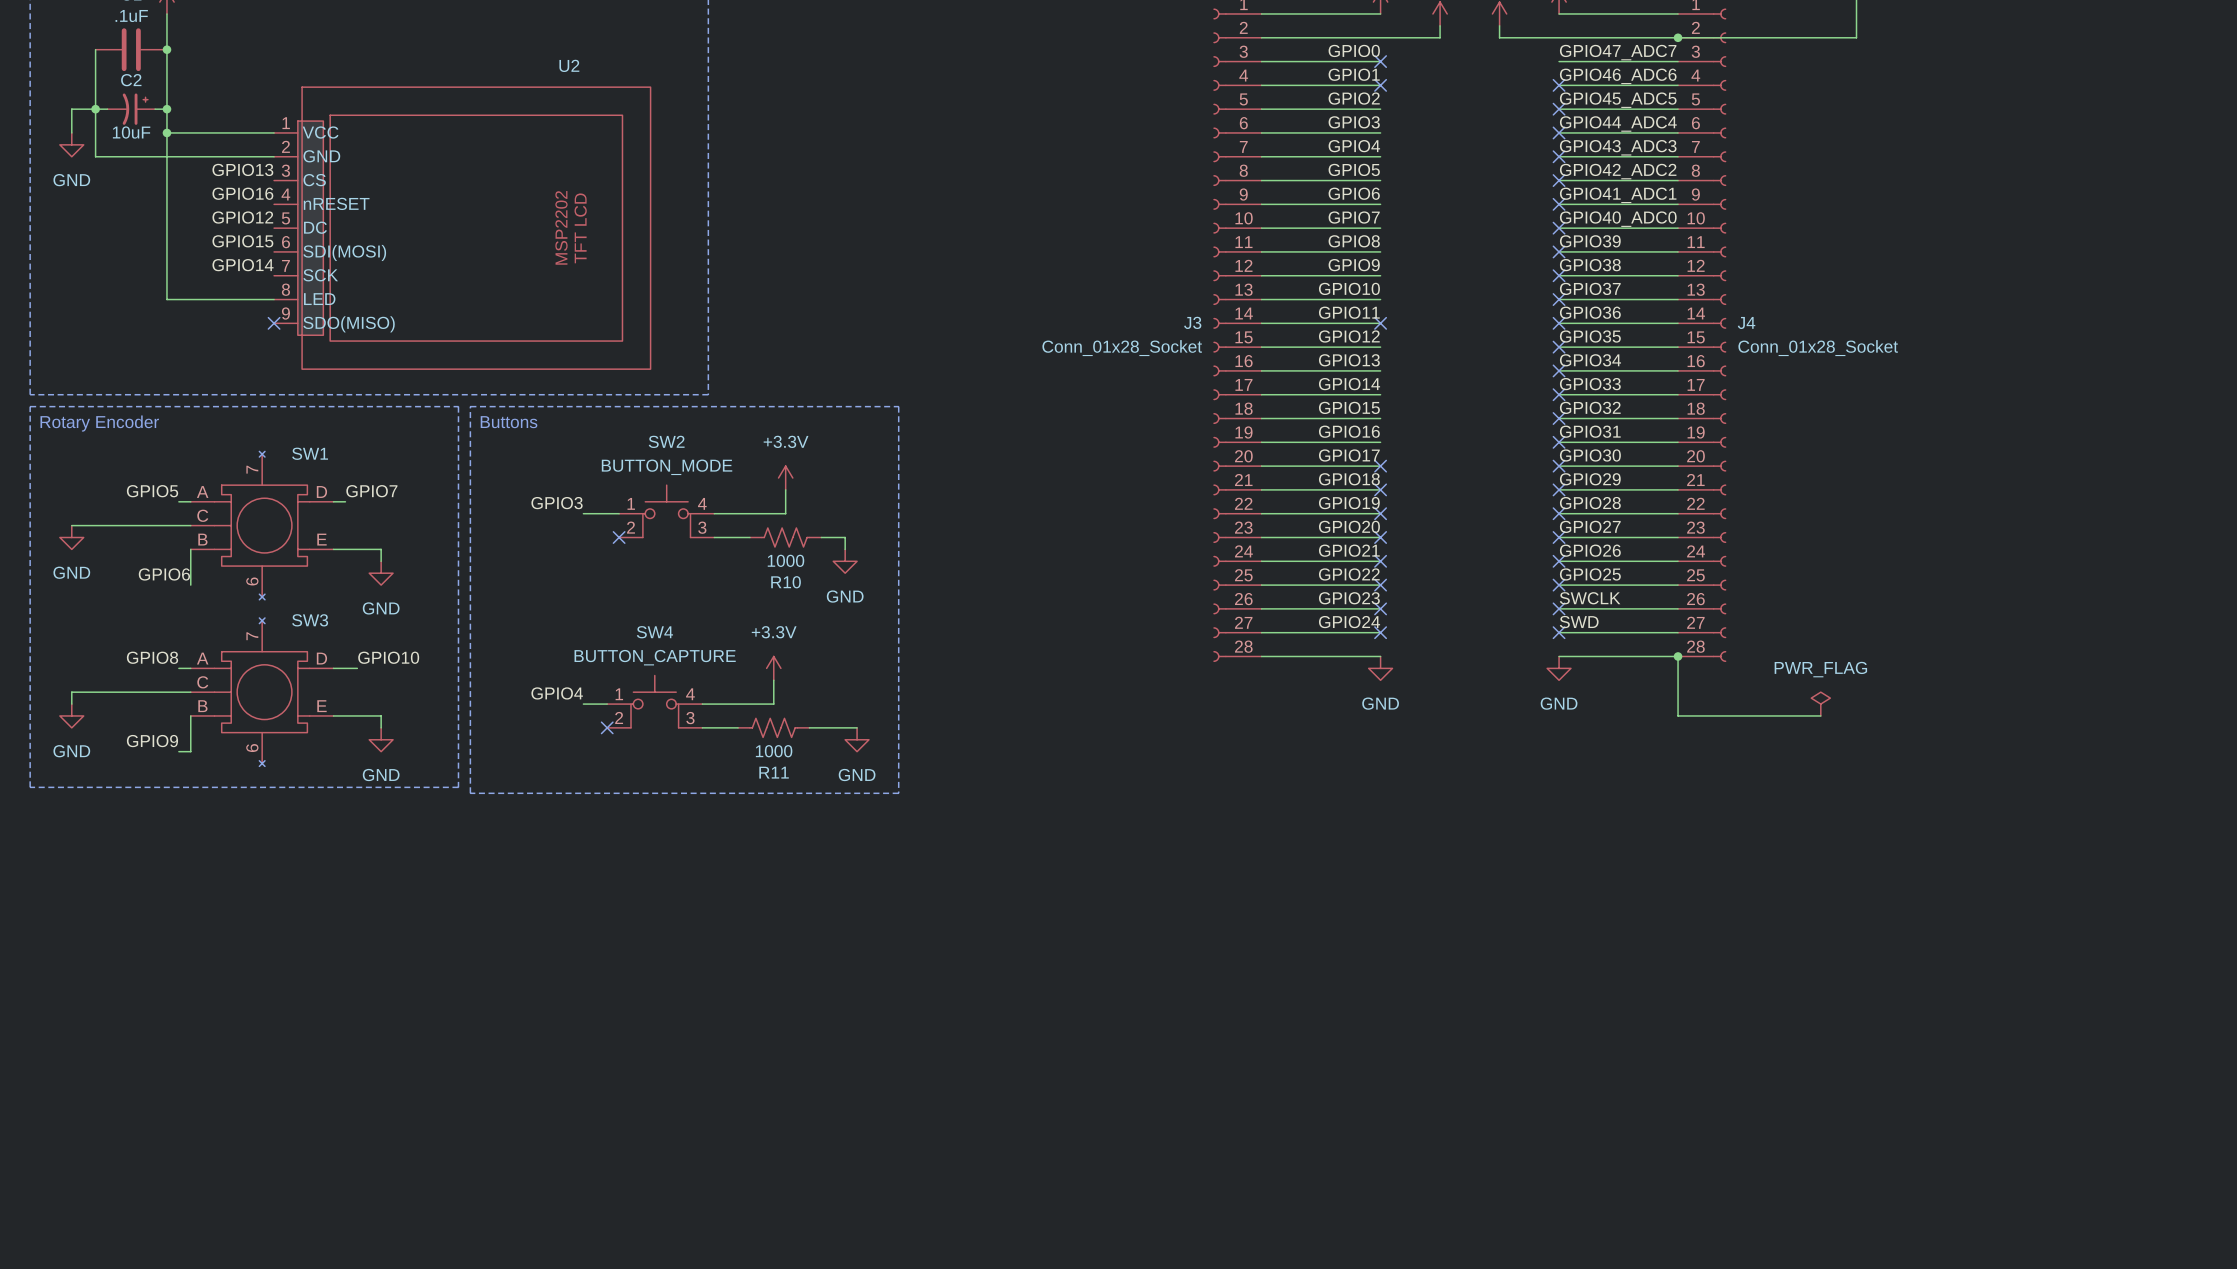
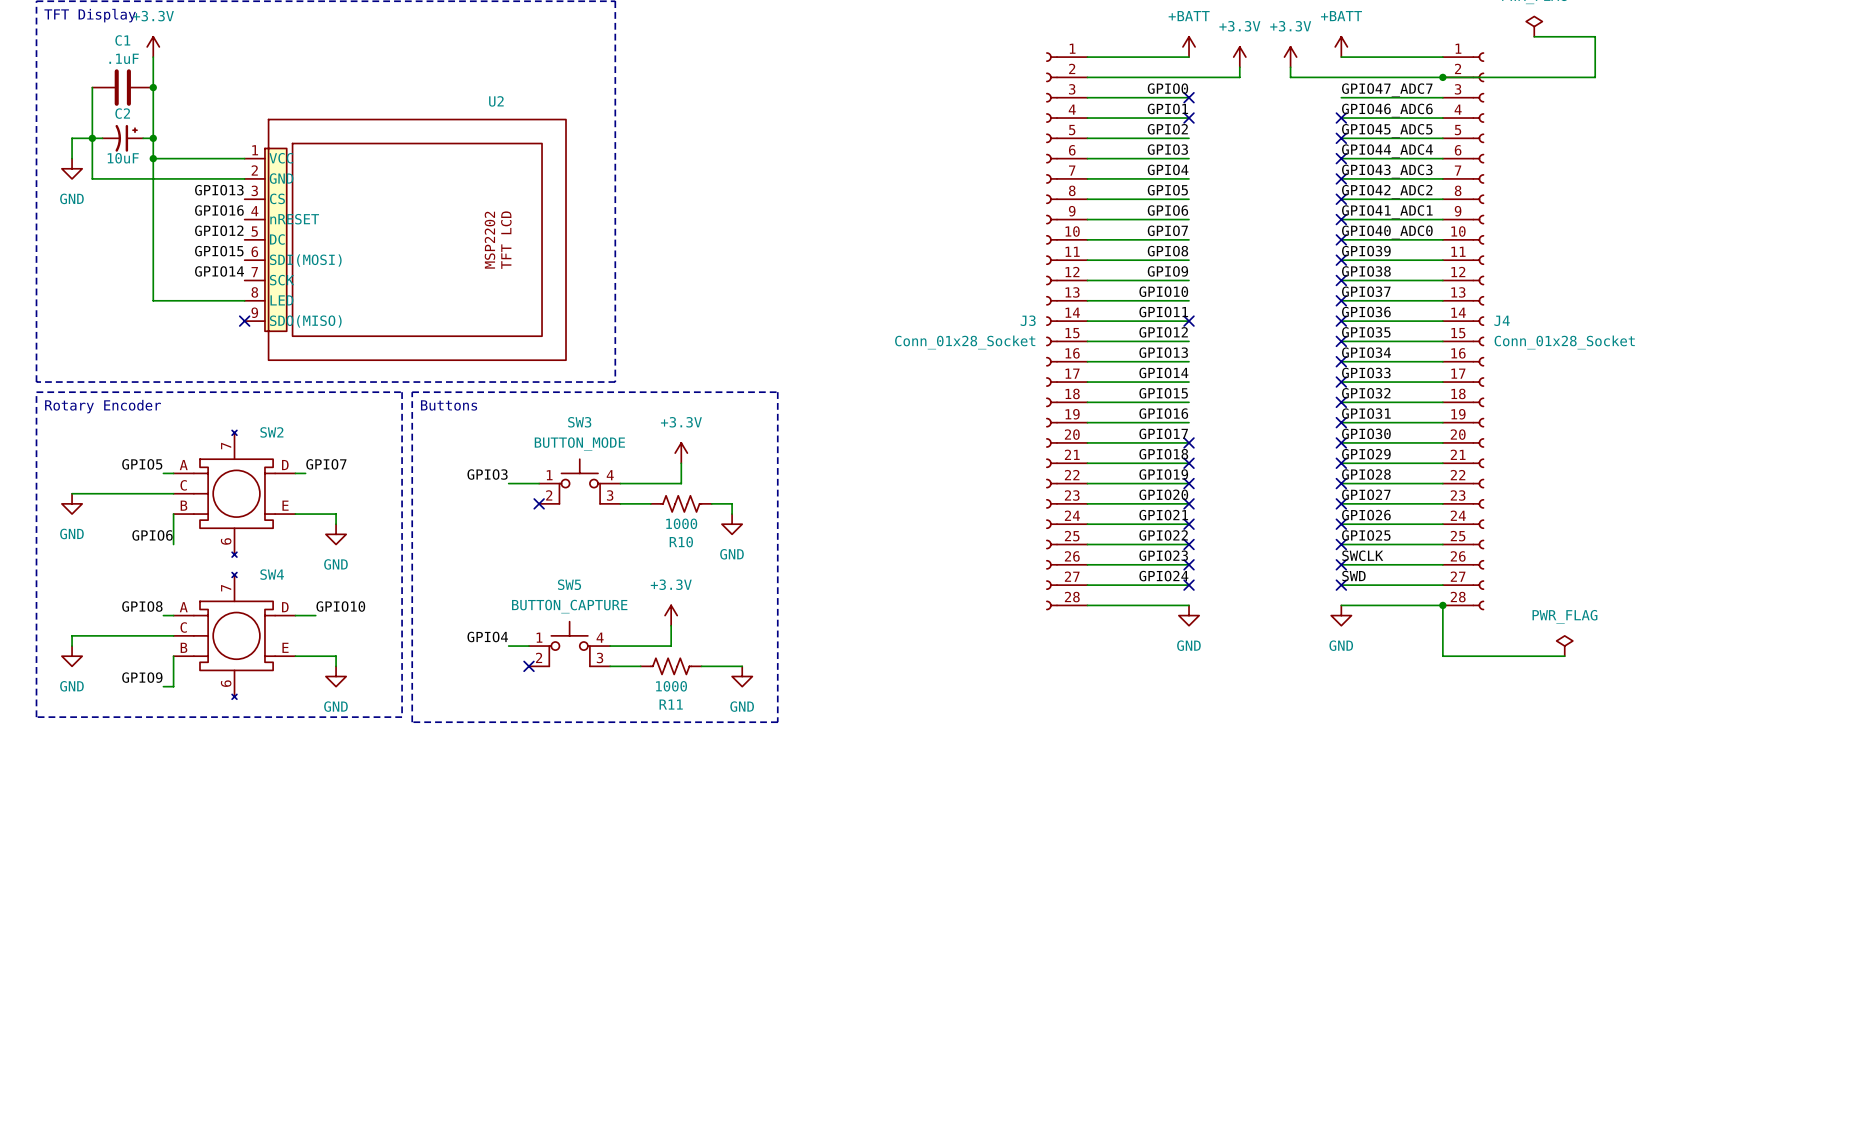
SW2 name: SW2 (666, 441) -> SW3 (579, 422)
SW1 name: SW1 (310, 453) -> SW2 (271, 432)
SW3 name: SW3 (310, 620) -> SW4 (272, 574)
SW4 name: SW4 (654, 632) -> SW5 (569, 584)

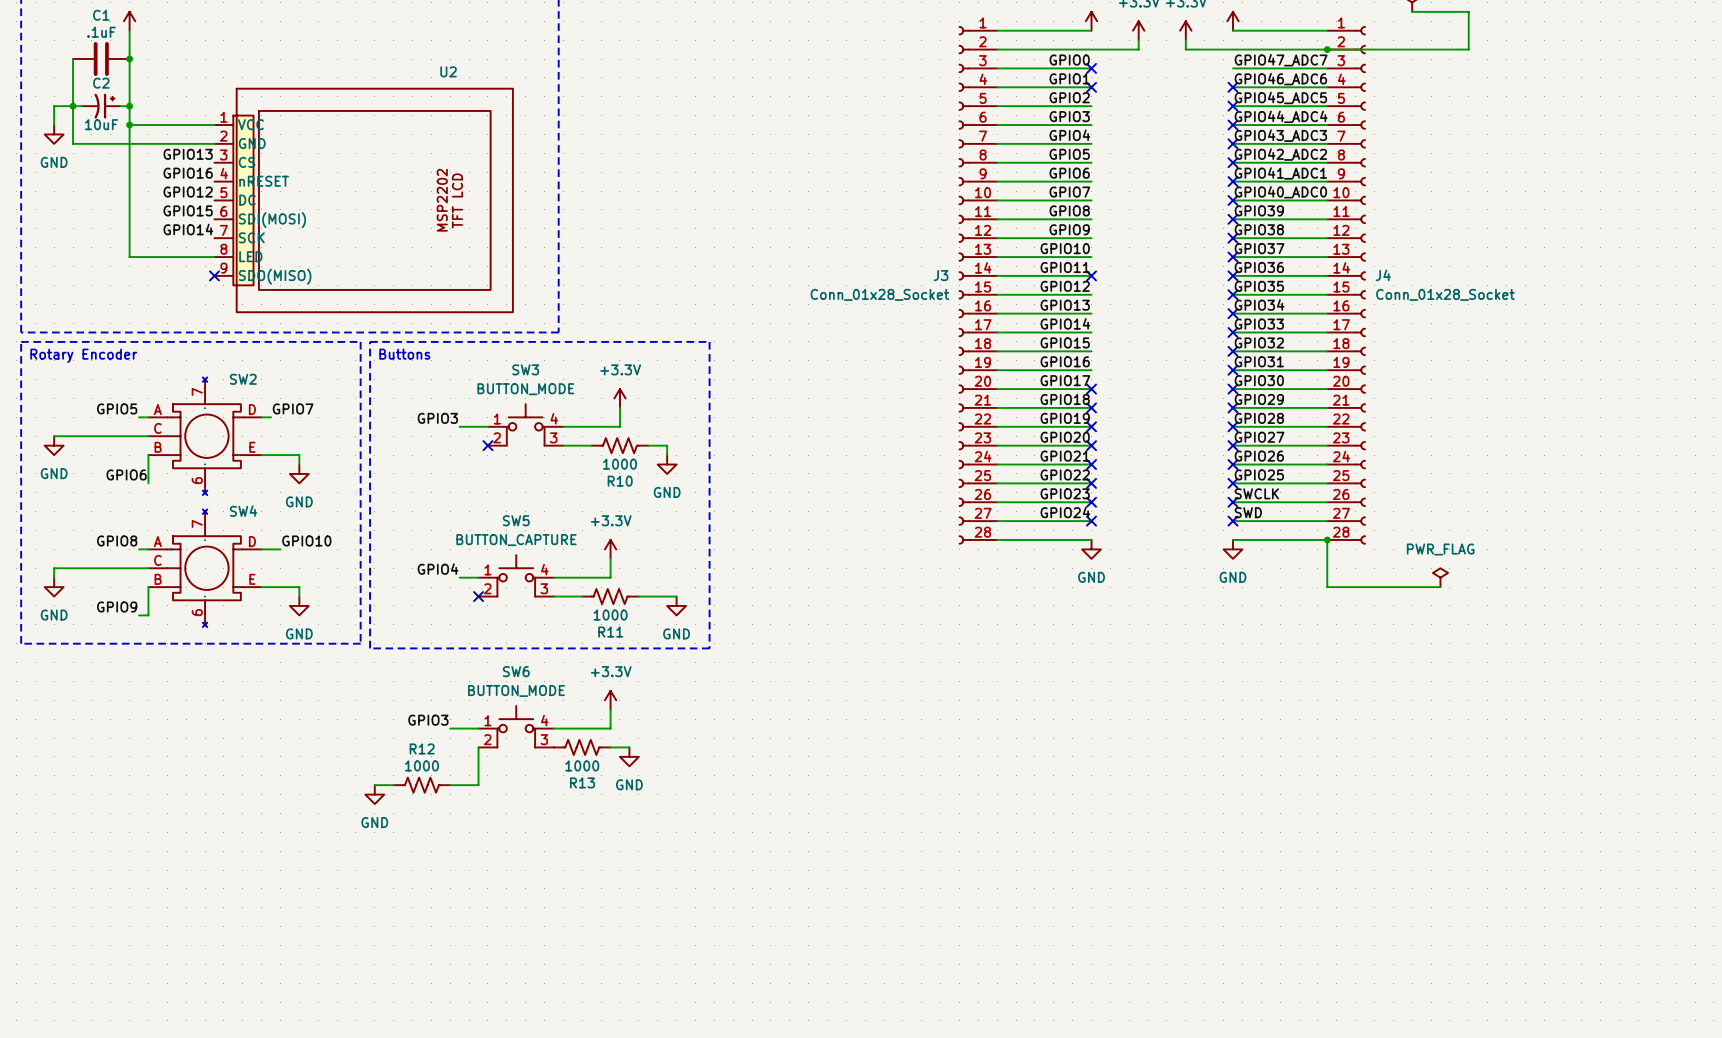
power symbol: none -> +3.3V (610, 700)
wire: none -> (610, 709) (610, 728) (553, 728)
label: none -> GPIO3 (428, 720)
SW6: none -> BUTTON_MODE (516, 726)
wire: none -> (450, 728) (478, 728)
wire: none -> (478, 747) (478, 785) (450, 785)
R13: none -> 1000 (582, 747)
wire: none -> (610, 747) (629, 747)
power symbol: none -> GND (629, 756)
wire: none -> (374, 785) (393, 785)
R12: none -> 1000 (421, 785)
power symbol: none -> GND (374, 794)

